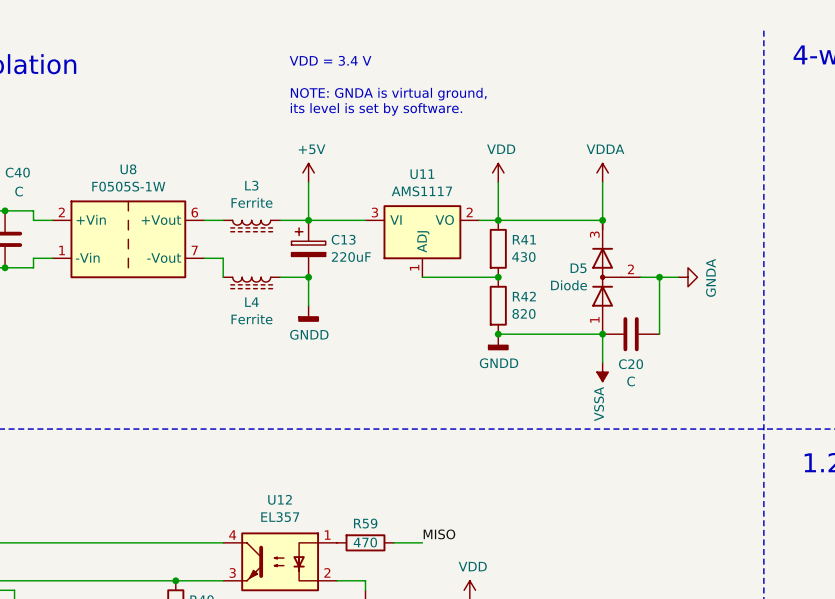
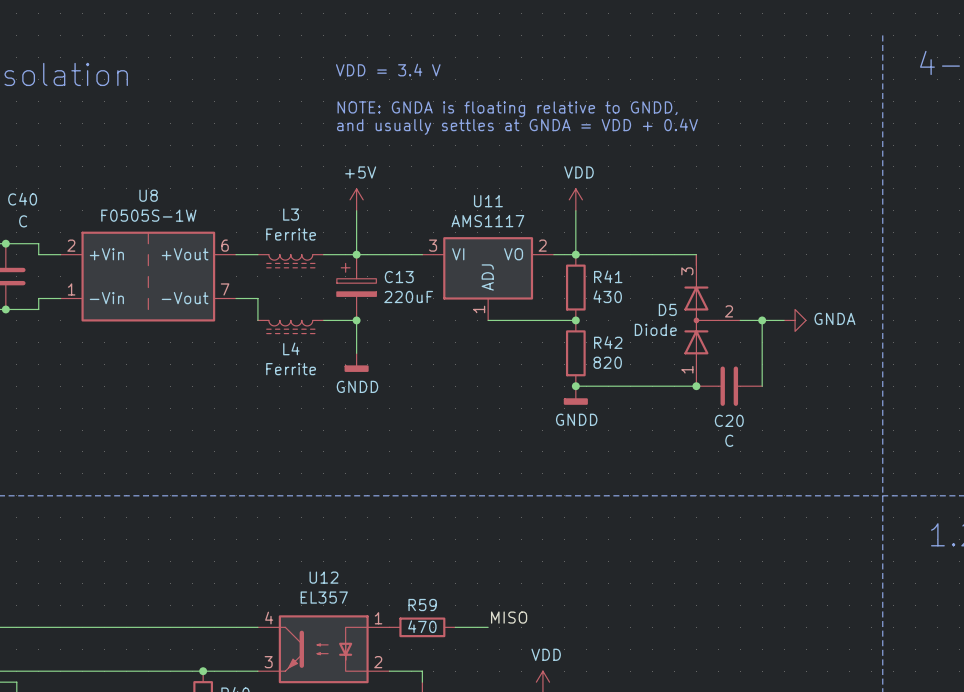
text: NOTE: GNDA is virtual ground, (388, 94) -> NOTE: GNDA is floating relative to GNDD, (507, 109)
text: its level is set by software. (376, 109) -> and usually settles at GNDA = VDD + 0.4V (517, 126)
power symbol: VDDA (602, 172) -> none
wire: (602, 182) (602, 220) -> none
junction: (602, 220) -> none
power symbol text rotation: 0° (710, 277) -> 90° clockwise (834, 318)
wire: (602, 334) (602, 362) -> none
power symbol: VSSA (602, 372) -> none

